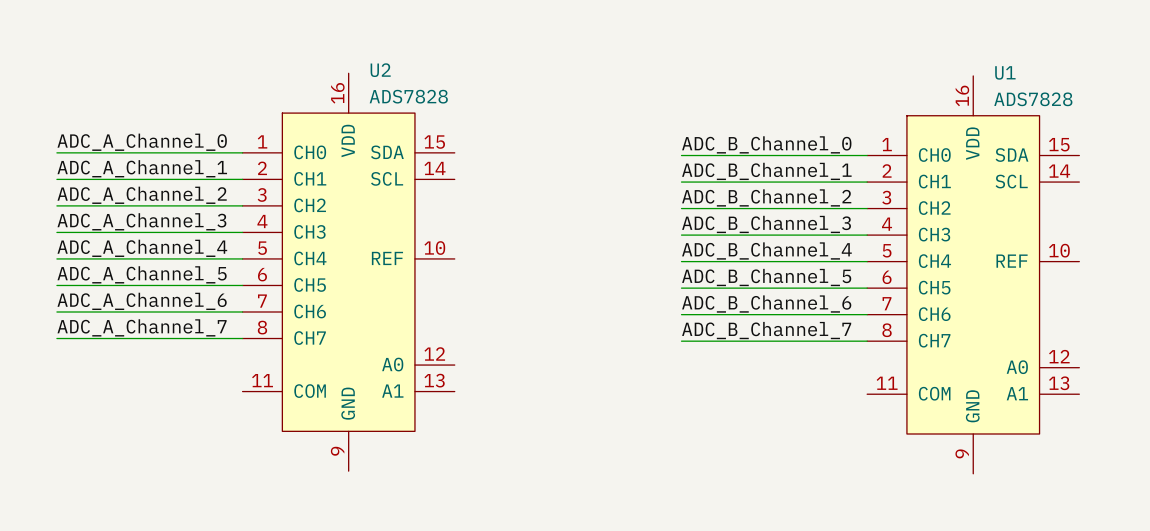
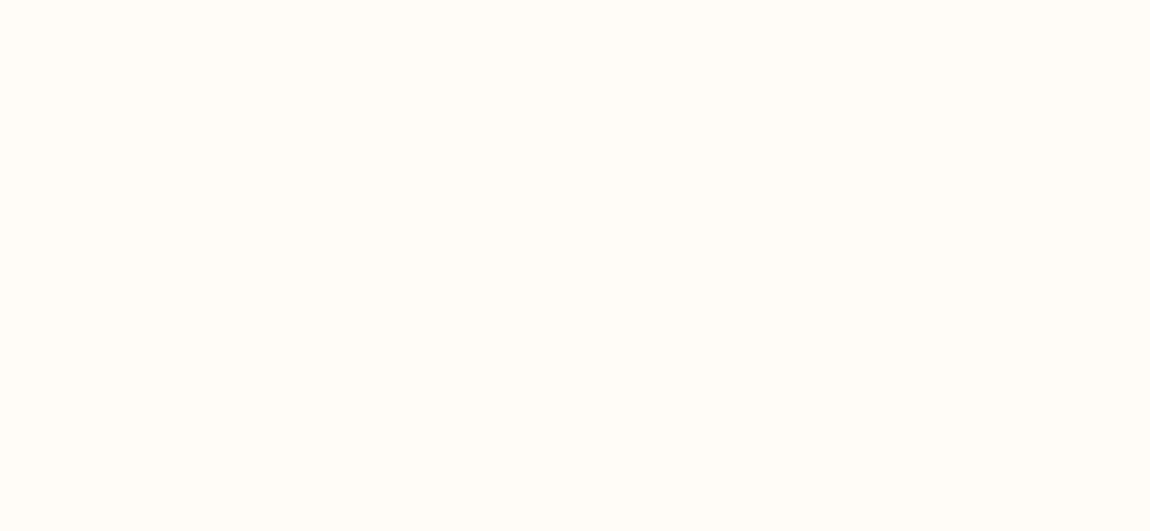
label: ADC_A_Channel_0 (142, 142) -> none
label: ADC_B_Channel_0 (766, 144) -> none
wire: (56, 152) (242, 152) -> none
wire: (681, 155) (867, 155) -> none
label: ADC_A_Channel_1 (142, 168) -> none
label: ADC_B_Channel_1 (766, 171) -> none
wire: (56, 179) (242, 179) -> none
wire: (681, 182) (867, 182) -> none
label: ADC_A_Channel_2 (142, 195) -> none
label: ADC_B_Channel_2 (766, 197) -> none
wire: (56, 205) (242, 205) -> none
wire: (681, 208) (867, 208) -> none
label: ADC_A_Channel_3 (141, 221) -> none
label: ADC_B_Channel_3 (766, 224) -> none
wire: (56, 232) (242, 232) -> none
wire: (681, 235) (867, 235) -> none
label: ADC_A_Channel_4 (142, 248) -> none
label: ADC_B_Channel_4 (766, 250) -> none
wire: (56, 258) (242, 258) -> none
wire: (681, 261) (867, 261) -> none
U2: ADS7828 (348, 272) -> none
label: ADC_A_Channel_5 (142, 274) -> none
U1: ADS7828 (973, 274) -> none
label: ADC_B_Channel_5 (766, 277) -> none
wire: (56, 285) (242, 285) -> none
wire: (681, 288) (867, 288) -> none
label: ADC_A_Channel_6 (142, 301) -> none
label: ADC_B_Channel_6 (766, 304) -> none
wire: (56, 312) (242, 312) -> none
wire: (681, 314) (867, 314) -> none
label: ADC_A_Channel_7 (142, 327) -> none
label: ADC_B_Channel_7 (766, 330) -> none
wire: (56, 338) (242, 338) -> none
wire: (681, 341) (867, 341) -> none

